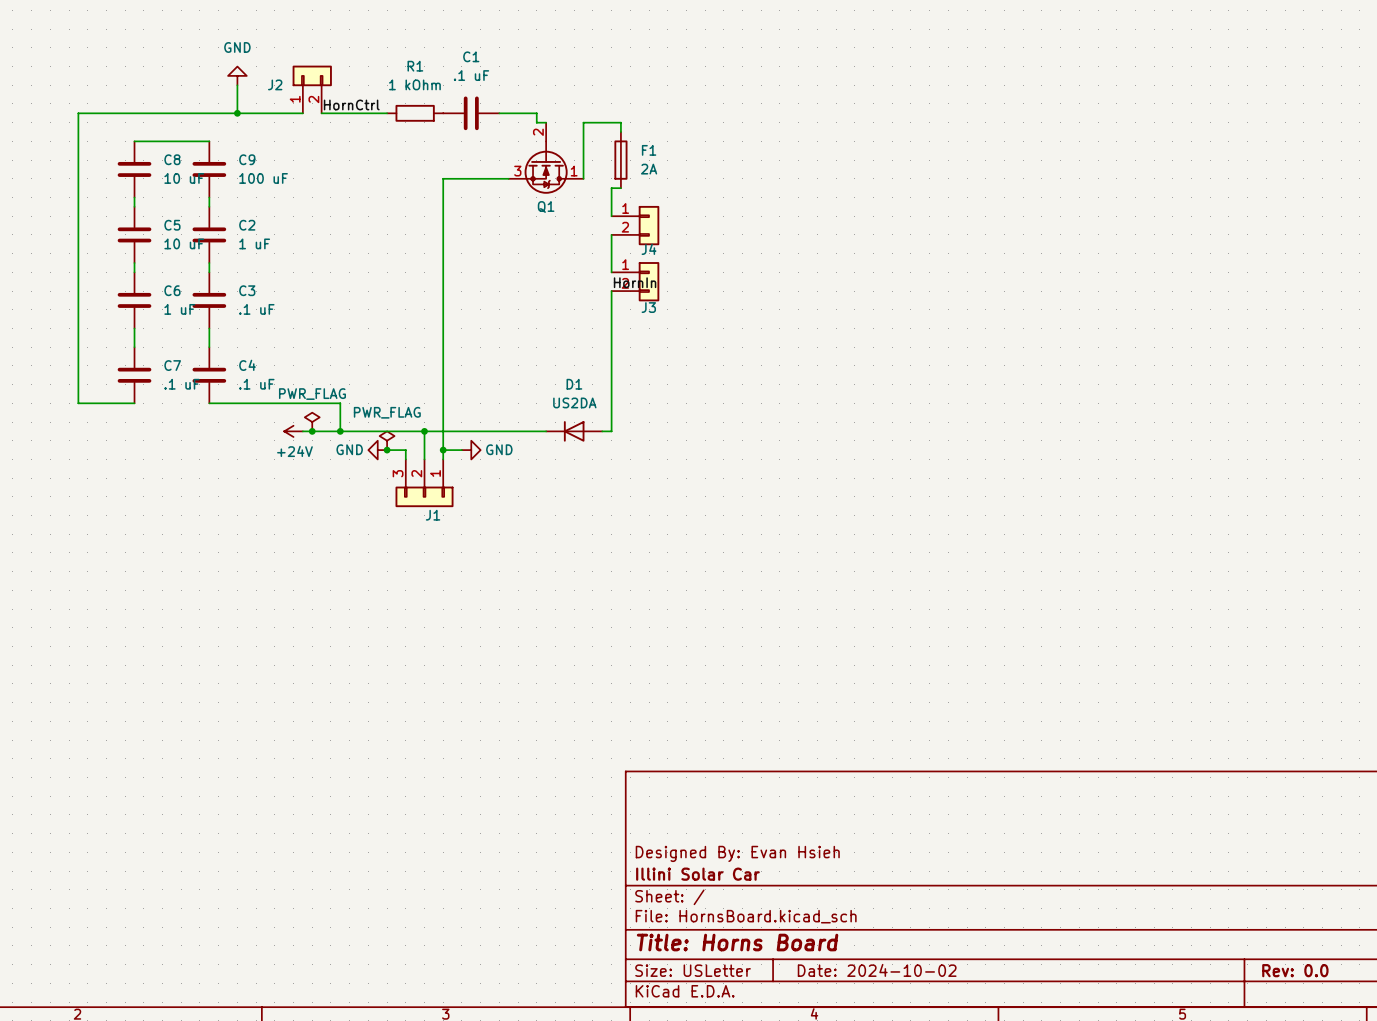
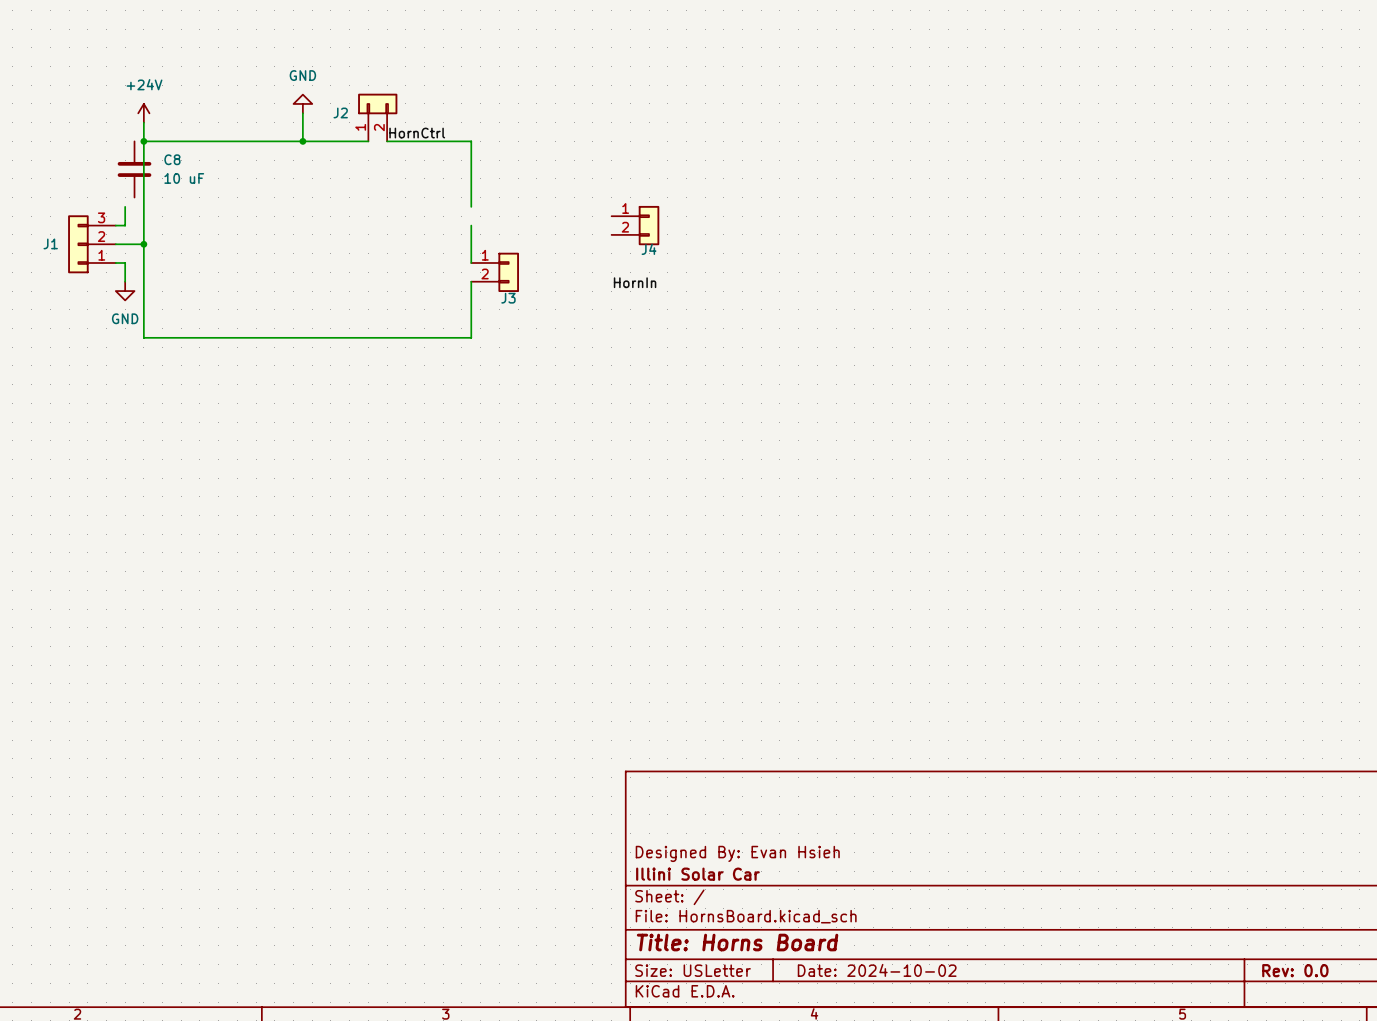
power symbol position: GND (237, 75) -> GND (302, 103)
wire: (237, 85) (237, 113) -> none
J2 position: (312, 89) -> (377, 117)
label position: HornCtrl (351, 104) -> HornCtrl (417, 133)
power symbol: none -> +24V (143, 113)
junction: (237, 113) -> none
wire: (302, 113) (78, 113) (78, 403) (134, 403) -> (302, 113) (302, 141)
wire: (321, 113) (387, 113) -> none
R1: 1 kOhm (415, 113) -> none
C1: .1 uF (471, 113) -> none
wire: (499, 113) (536, 113) (536, 122) (546, 122) -> none
wire: none -> (143, 122) (143, 337) (471, 337) (471, 281)
wire: (620, 132) (620, 122) (583, 122) (583, 178) -> none
wire: (134, 141) (143, 141) -> none
junction: none -> (143, 141)
wire: none -> (209, 141) (368, 141)
junction: none -> (302, 141)
wire: none -> (387, 141) (471, 141) (471, 206)
Q1: (546, 158) -> none
F1: 2A (620, 160) -> none
C9: 100 uF (209, 169) -> none
wire: (508, 178) (443, 178) (443, 459) -> none
wire: (620, 188) (611, 188) (611, 216) -> none
wire: (134, 197) (134, 206) -> none
wire: (209, 197) (209, 206) -> none
wire: none -> (125, 206) (125, 225) (115, 225)
C5: 10 uF (134, 234) -> none
C2: 1 uF (209, 234) -> none
wire: (611, 234) (611, 272) -> (471, 225) (471, 263)
wire: none -> (115, 244) (143, 244)
junction: none -> (143, 244)
wire: none -> (115, 263) (125, 263) (125, 281)
wire: (134, 263) (134, 272) -> none
wire: (209, 263) (209, 272) -> none
J3 position: (635, 281) -> (495, 272)
power symbol: none -> GND (125, 291)
wire: (611, 291) (611, 431) (602, 431) -> none
C6: 1 uF (134, 300) -> none
C3: .1 uF (209, 300) -> none
wire: (134, 328) (134, 347) -> none
wire: (209, 328) (209, 347) -> none
C7: .1 uF (134, 375) -> none
C4: .1 uF (209, 375) -> none
wire: (209, 403) (340, 403) (340, 431) -> none
power symbol: PWR_FLAG (312, 422) -> none
power symbol: +24V (293, 431) -> none
wire: (302, 431) (546, 431) -> none
junction: (312, 431) -> none
junction: (340, 431) -> none
wire: (424, 431) (424, 459) -> none
junction: (424, 431) -> none
D1: US2DA (574, 431) -> none
power symbol: PWR_FLAG (387, 440) -> none
power symbol: GND (377, 450) -> none
wire: (387, 450) (405, 450) (405, 459) -> none
junction: (387, 450) -> none
wire: (443, 450) (461, 450) -> none
junction: (443, 450) -> none
power symbol: GND (471, 450) -> none
J1 position: (424, 483) -> (91, 244)
J1 rotation: 0° (424, 496) -> 90° clockwise (78, 244)
J1 name position: J1 (433, 515) -> J1 (50, 243)

